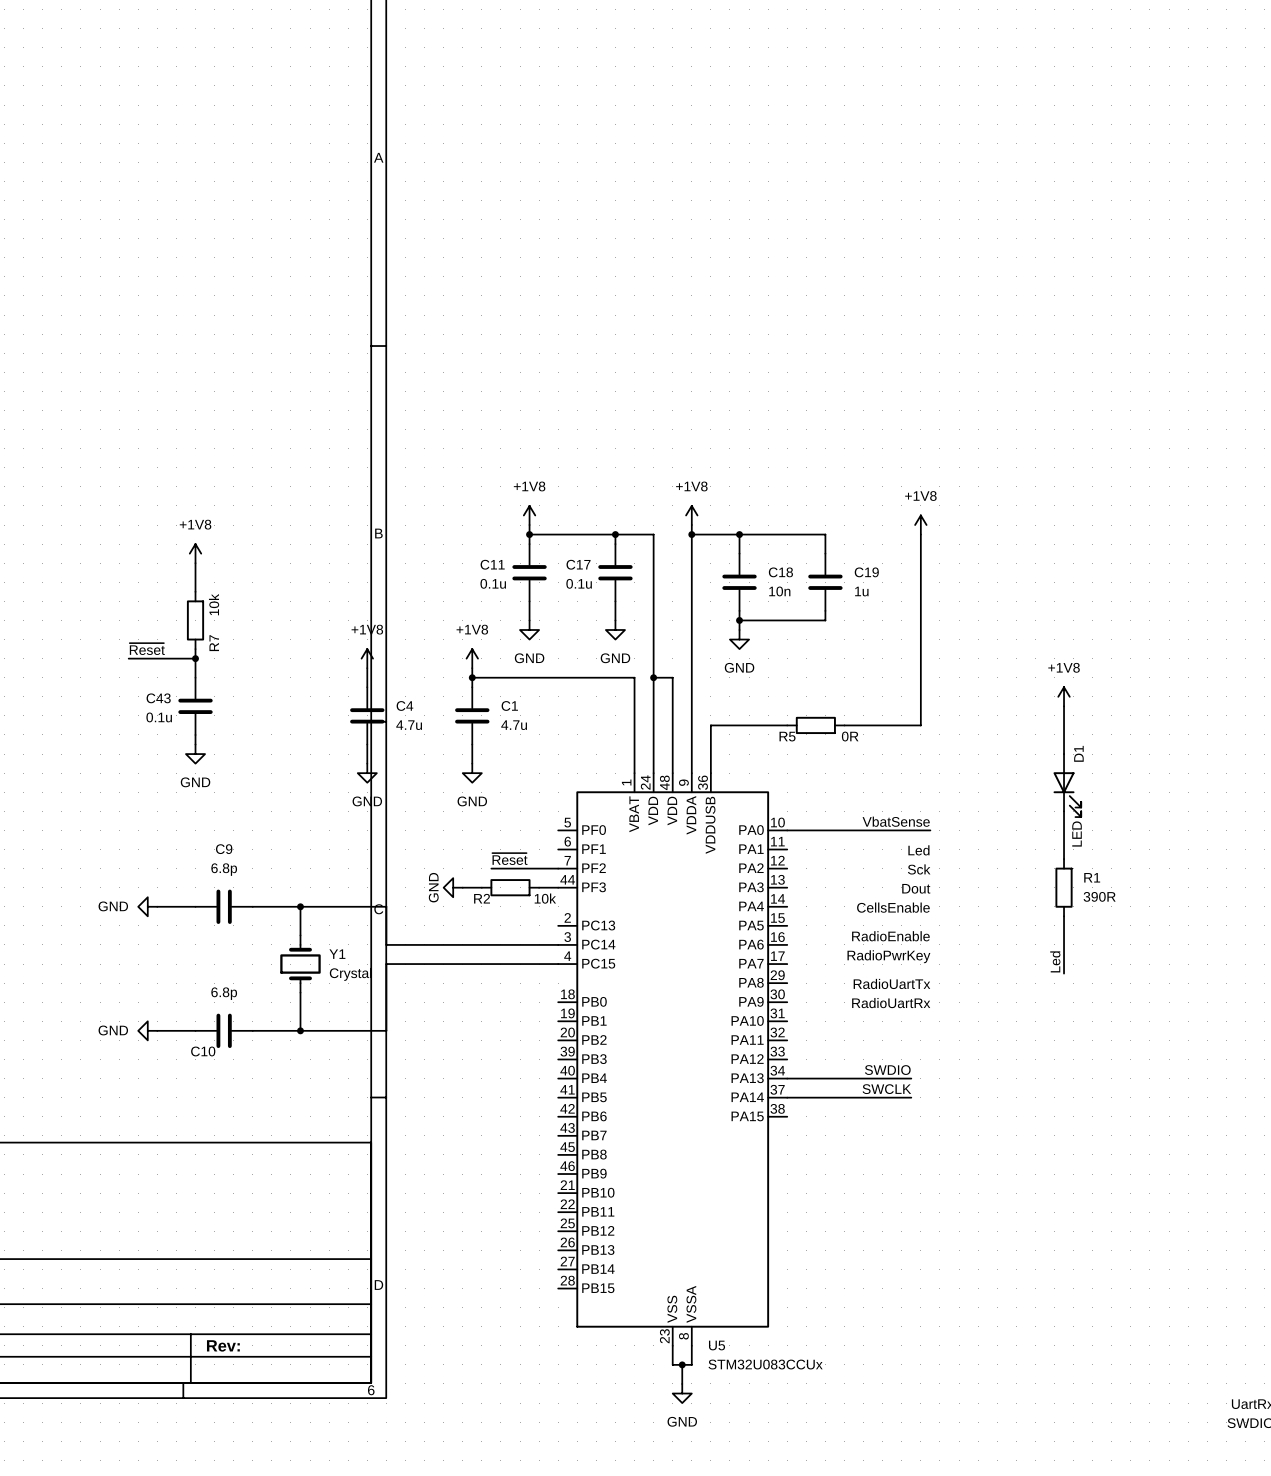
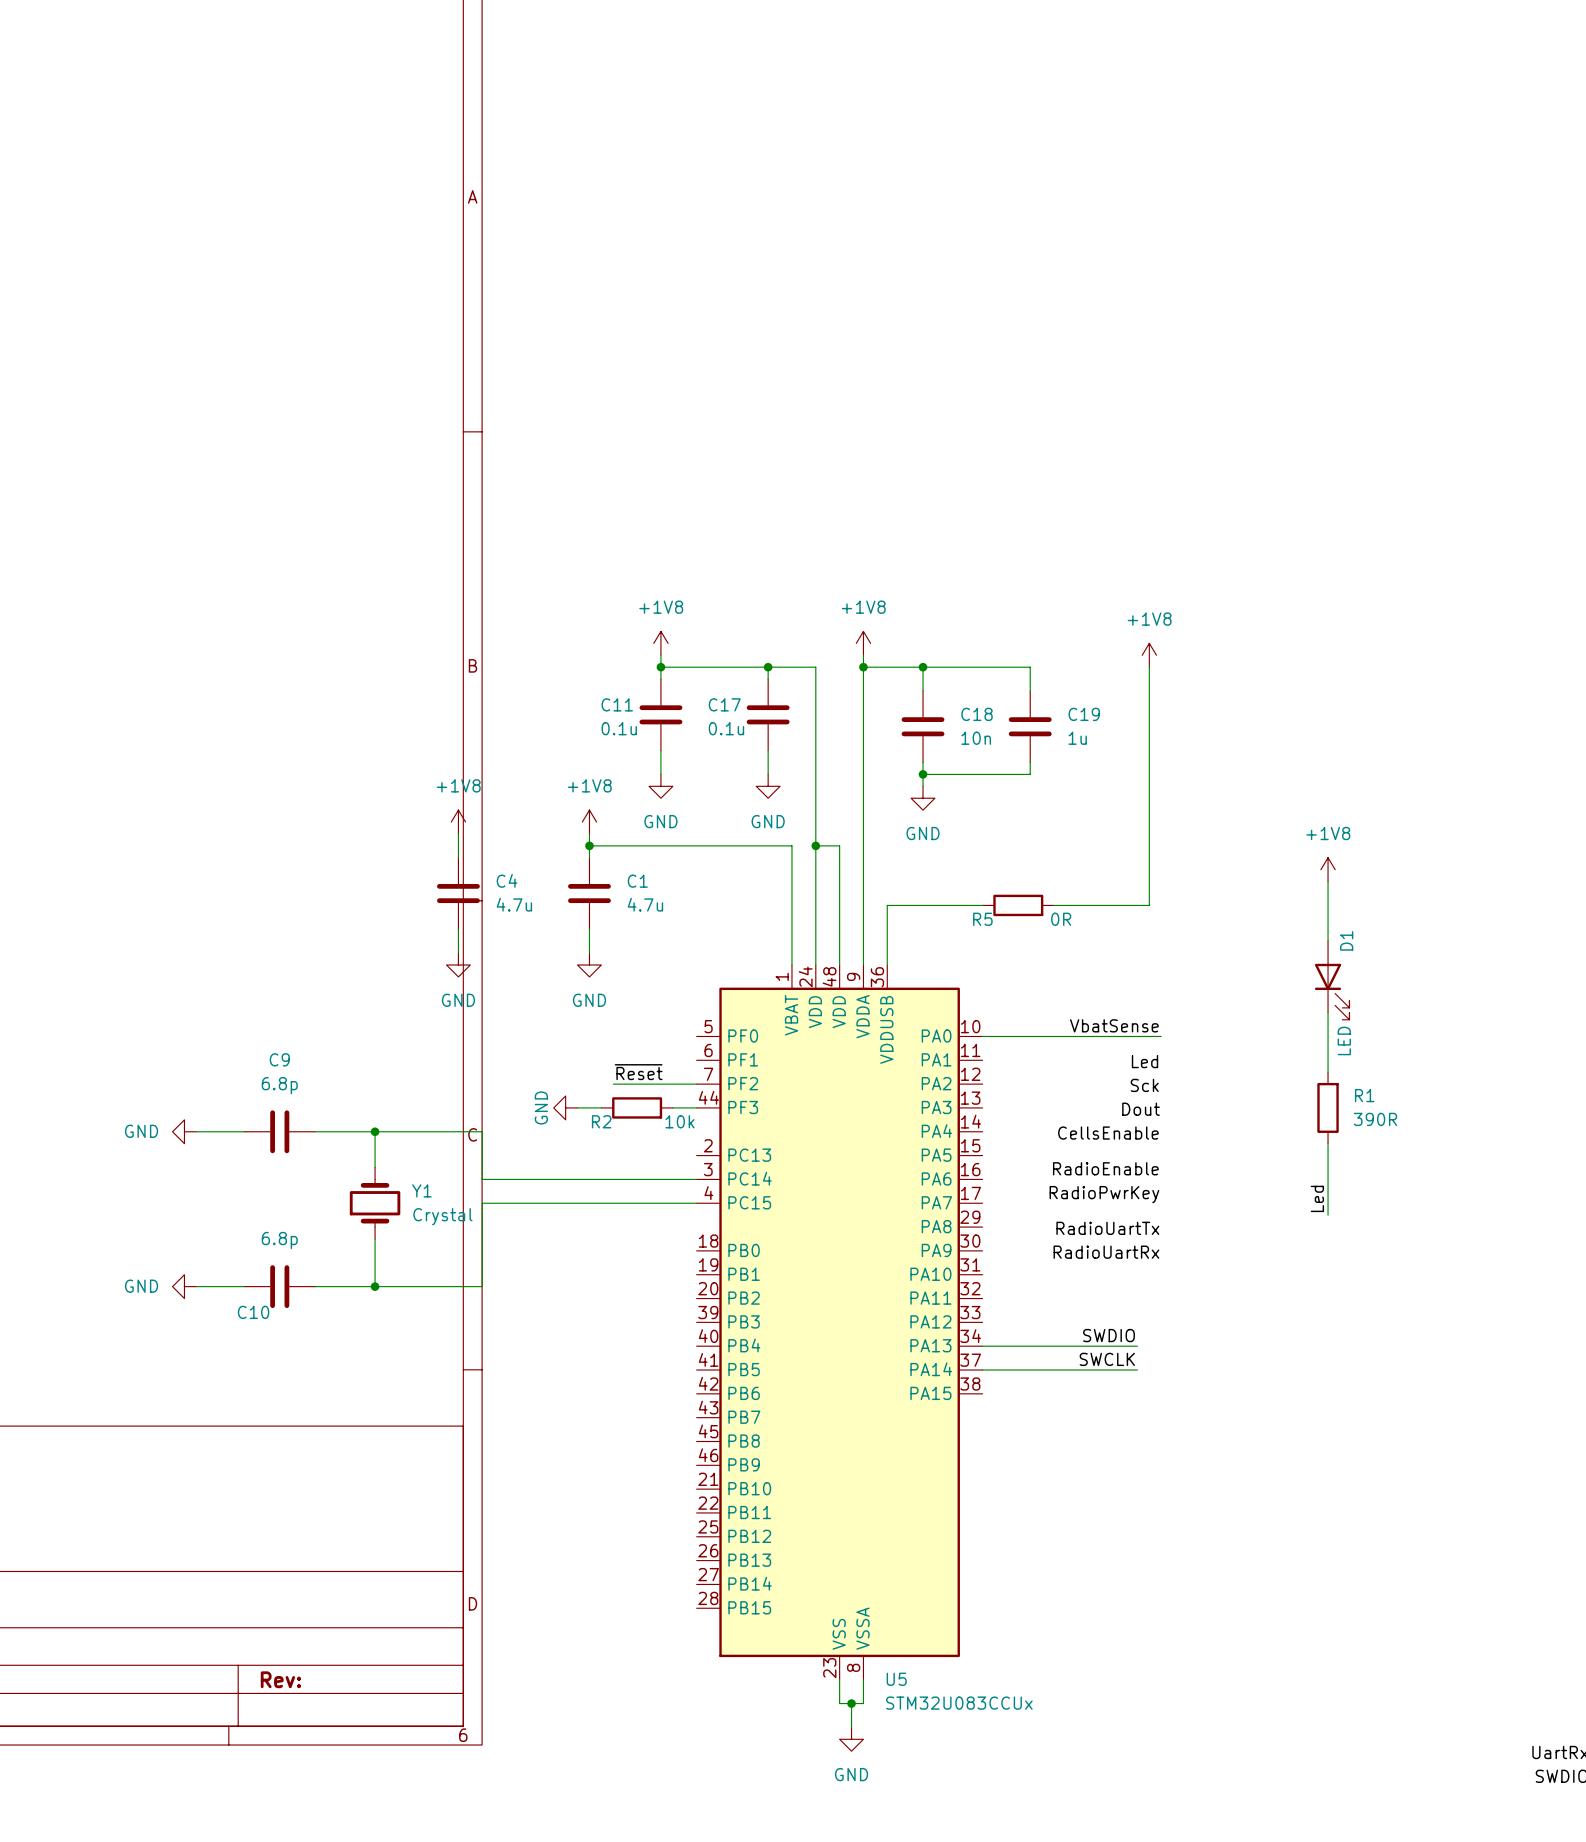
power symbol: +1V8 (195, 553) -> none
wire: (195, 563) (195, 591) -> none
R7: 10k (195, 620) -> none
label: ~{Reset} (147, 649) -> none
wire: (195, 649) (195, 677) -> none
wire: (128, 658) (195, 658) -> none
junction: (195, 658) -> none
C43: 0.1u (195, 706) -> none
wire: (195, 734) (195, 744) -> none
power symbol: GND (195, 754) -> none

